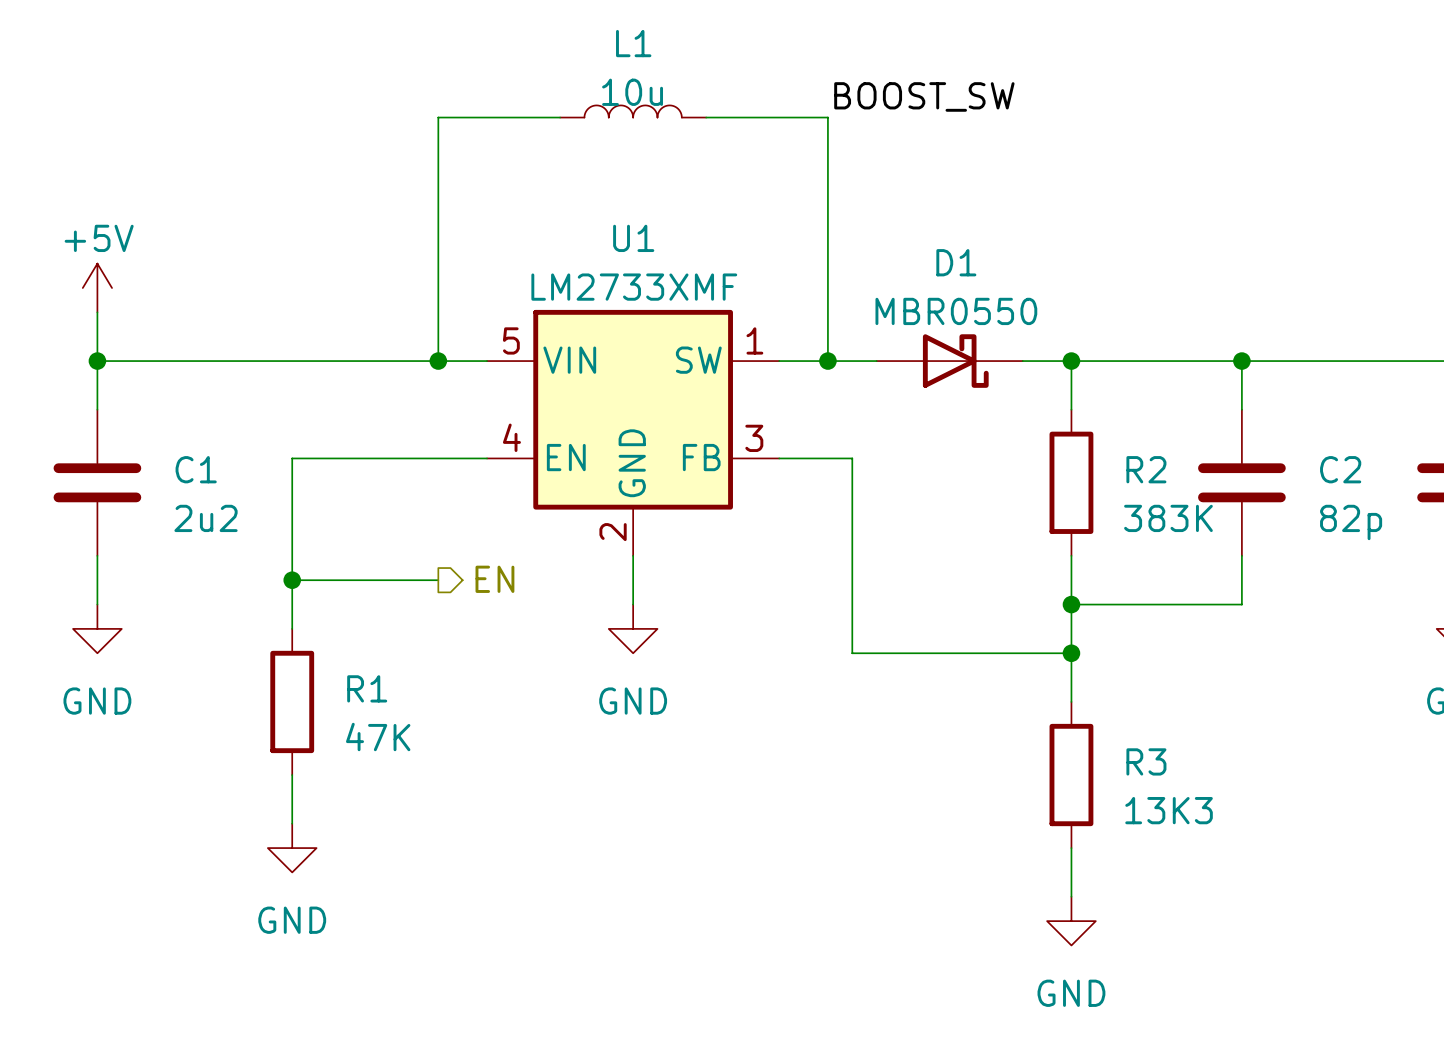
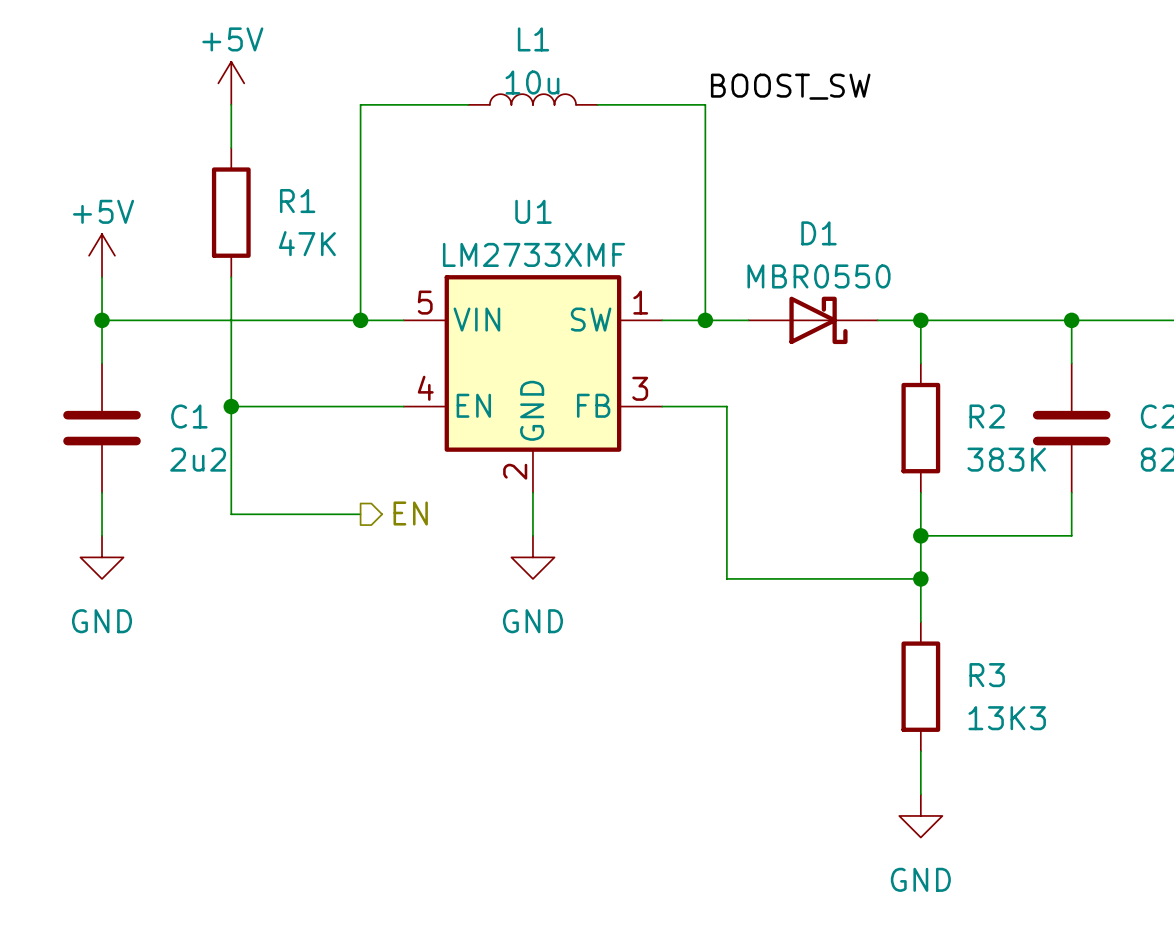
power symbol: none -> +5V (231, 83)
power symbol position: +5V (97, 287) -> +5V (102, 255)
wire: (97, 312) (97, 409) -> (102, 277) (102, 363)
wire: none -> (231, 277) (231, 406)
wire: (97, 361) (146, 361) -> none
junction position: (97, 361) -> (102, 320)
junction: none -> (231, 406)
C1 position: (97, 482) -> (102, 428)
wire: (97, 555) (97, 604) -> (102, 492) (102, 535)
wire: (292, 580) (292, 628) -> (231, 104) (231, 147)
junction: (292, 580) -> none
power symbol position: GND (97, 628) -> GND (102, 557)
R1 position: (292, 701) -> (231, 212)
wire: (292, 775) (292, 823) -> none
power symbol: GND (292, 848) -> none

